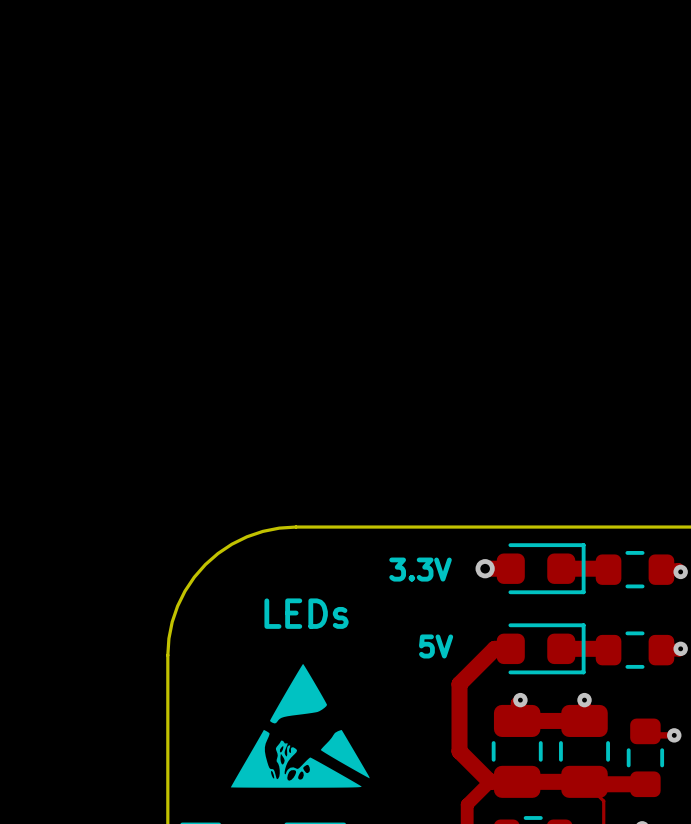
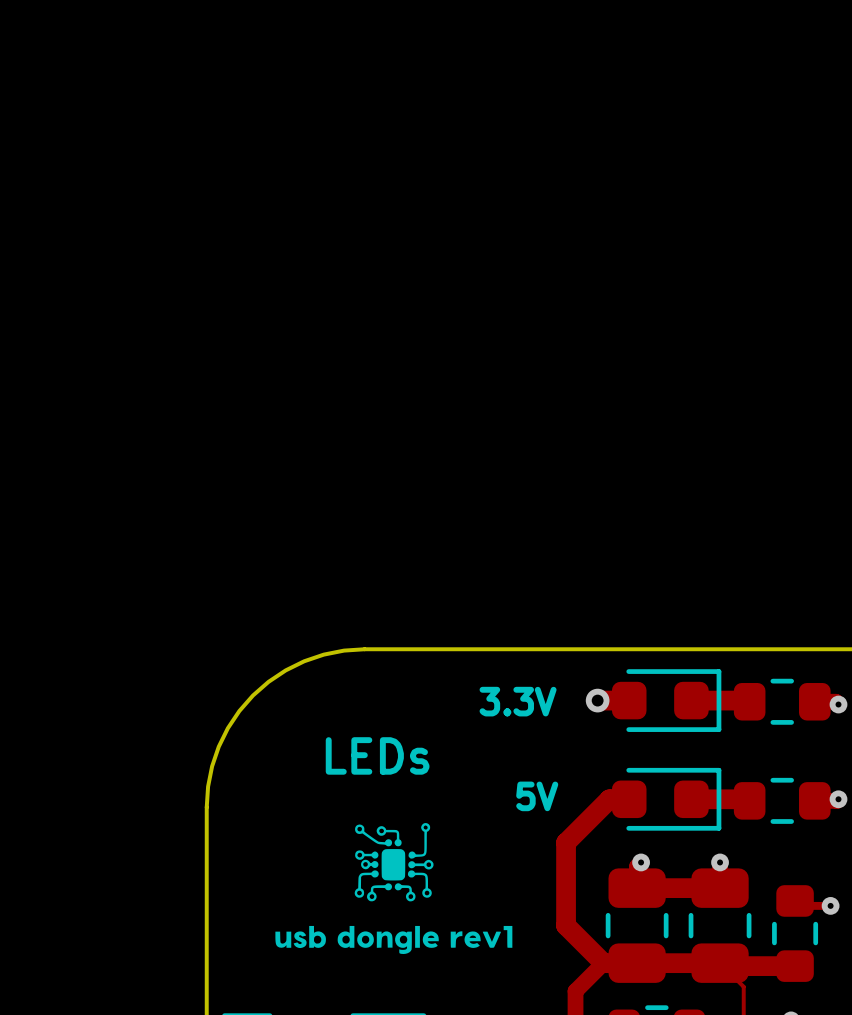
drawing shape: [230, 663, 370, 788] -> [275, 823, 513, 955]

